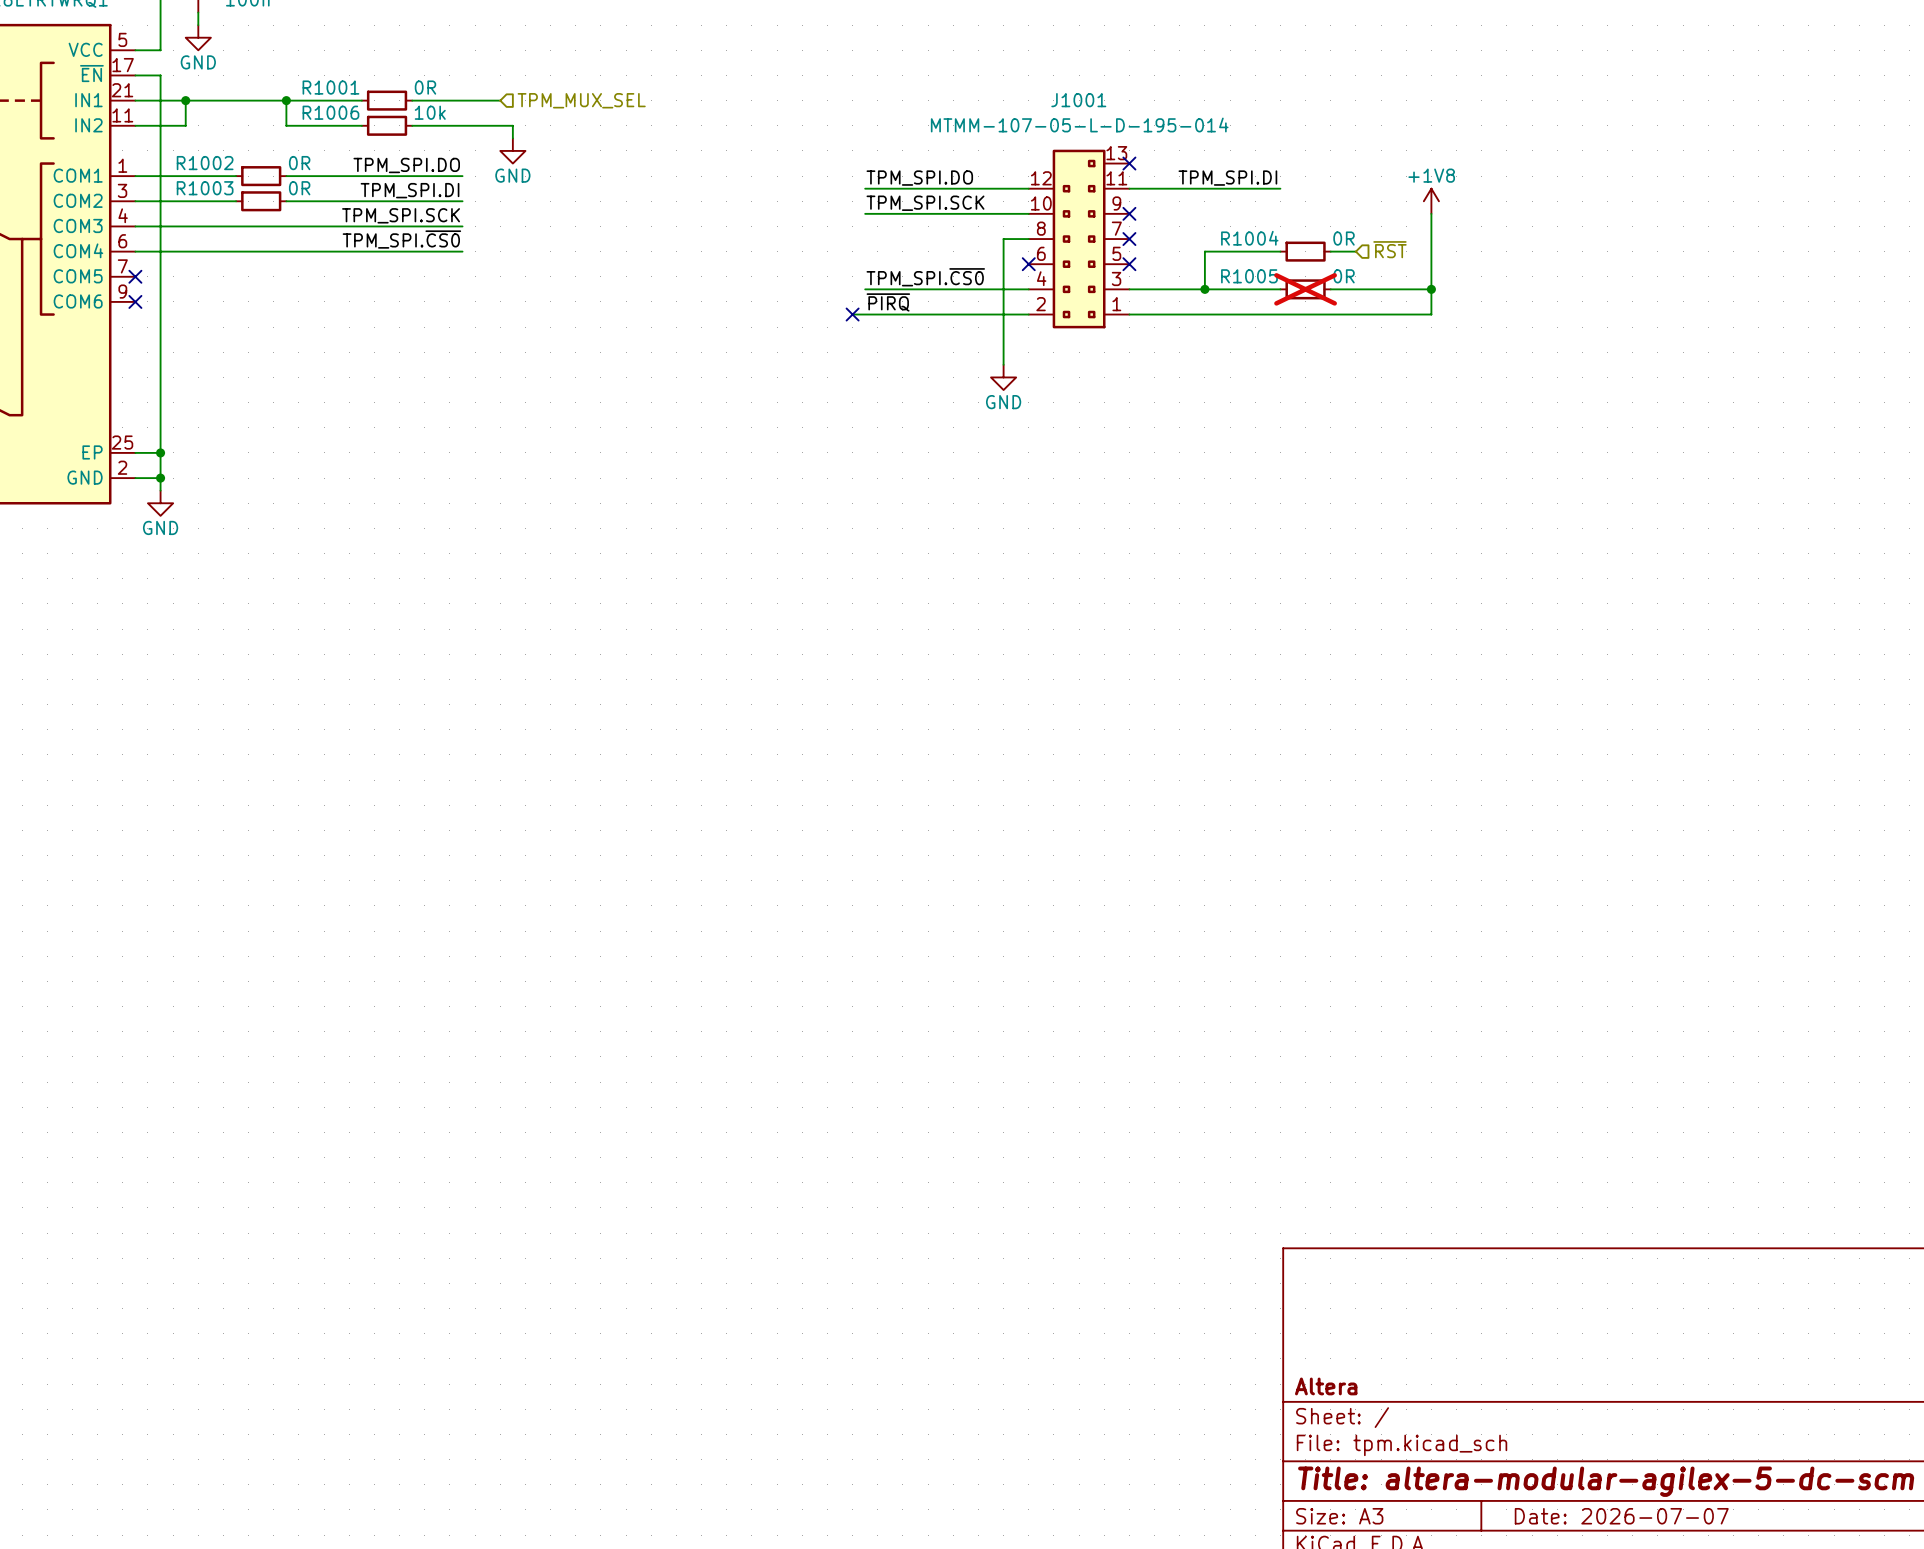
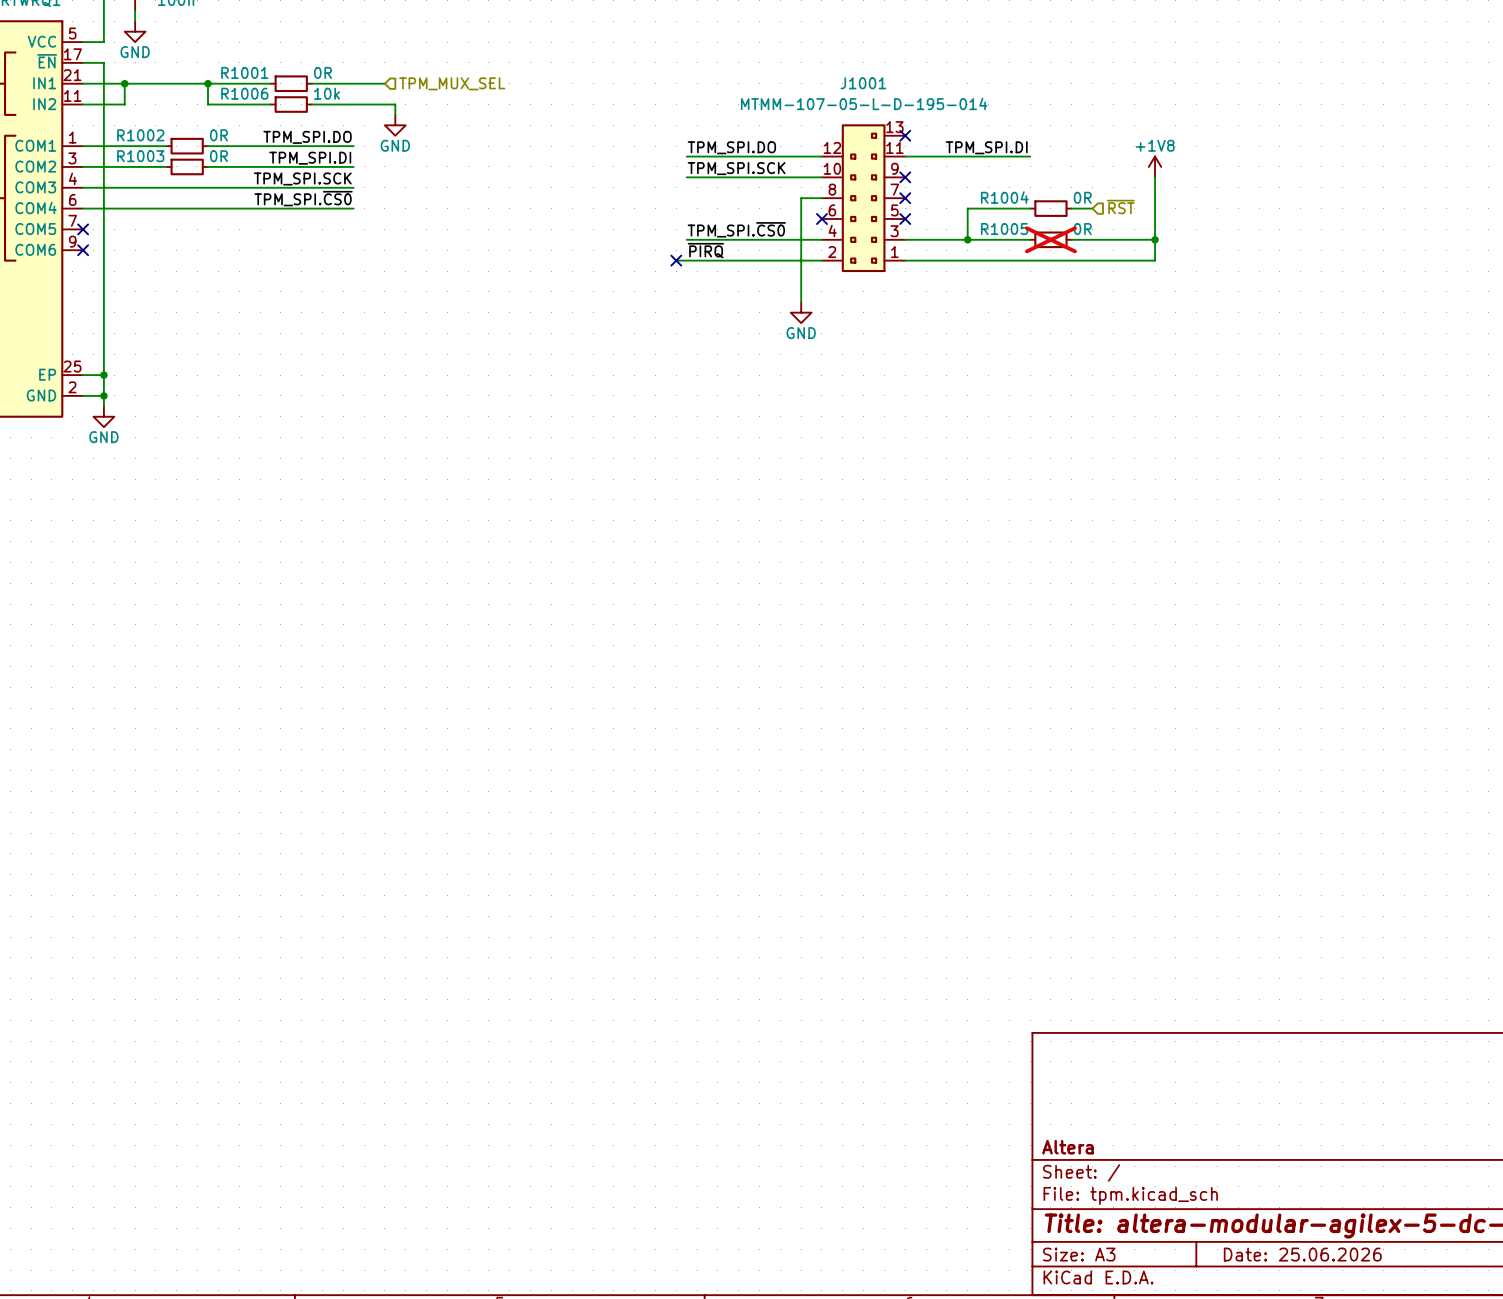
title block: Date: 2026-07-07 (1621, 1516) -> Date: 25.06.2026 (1302, 1254)

